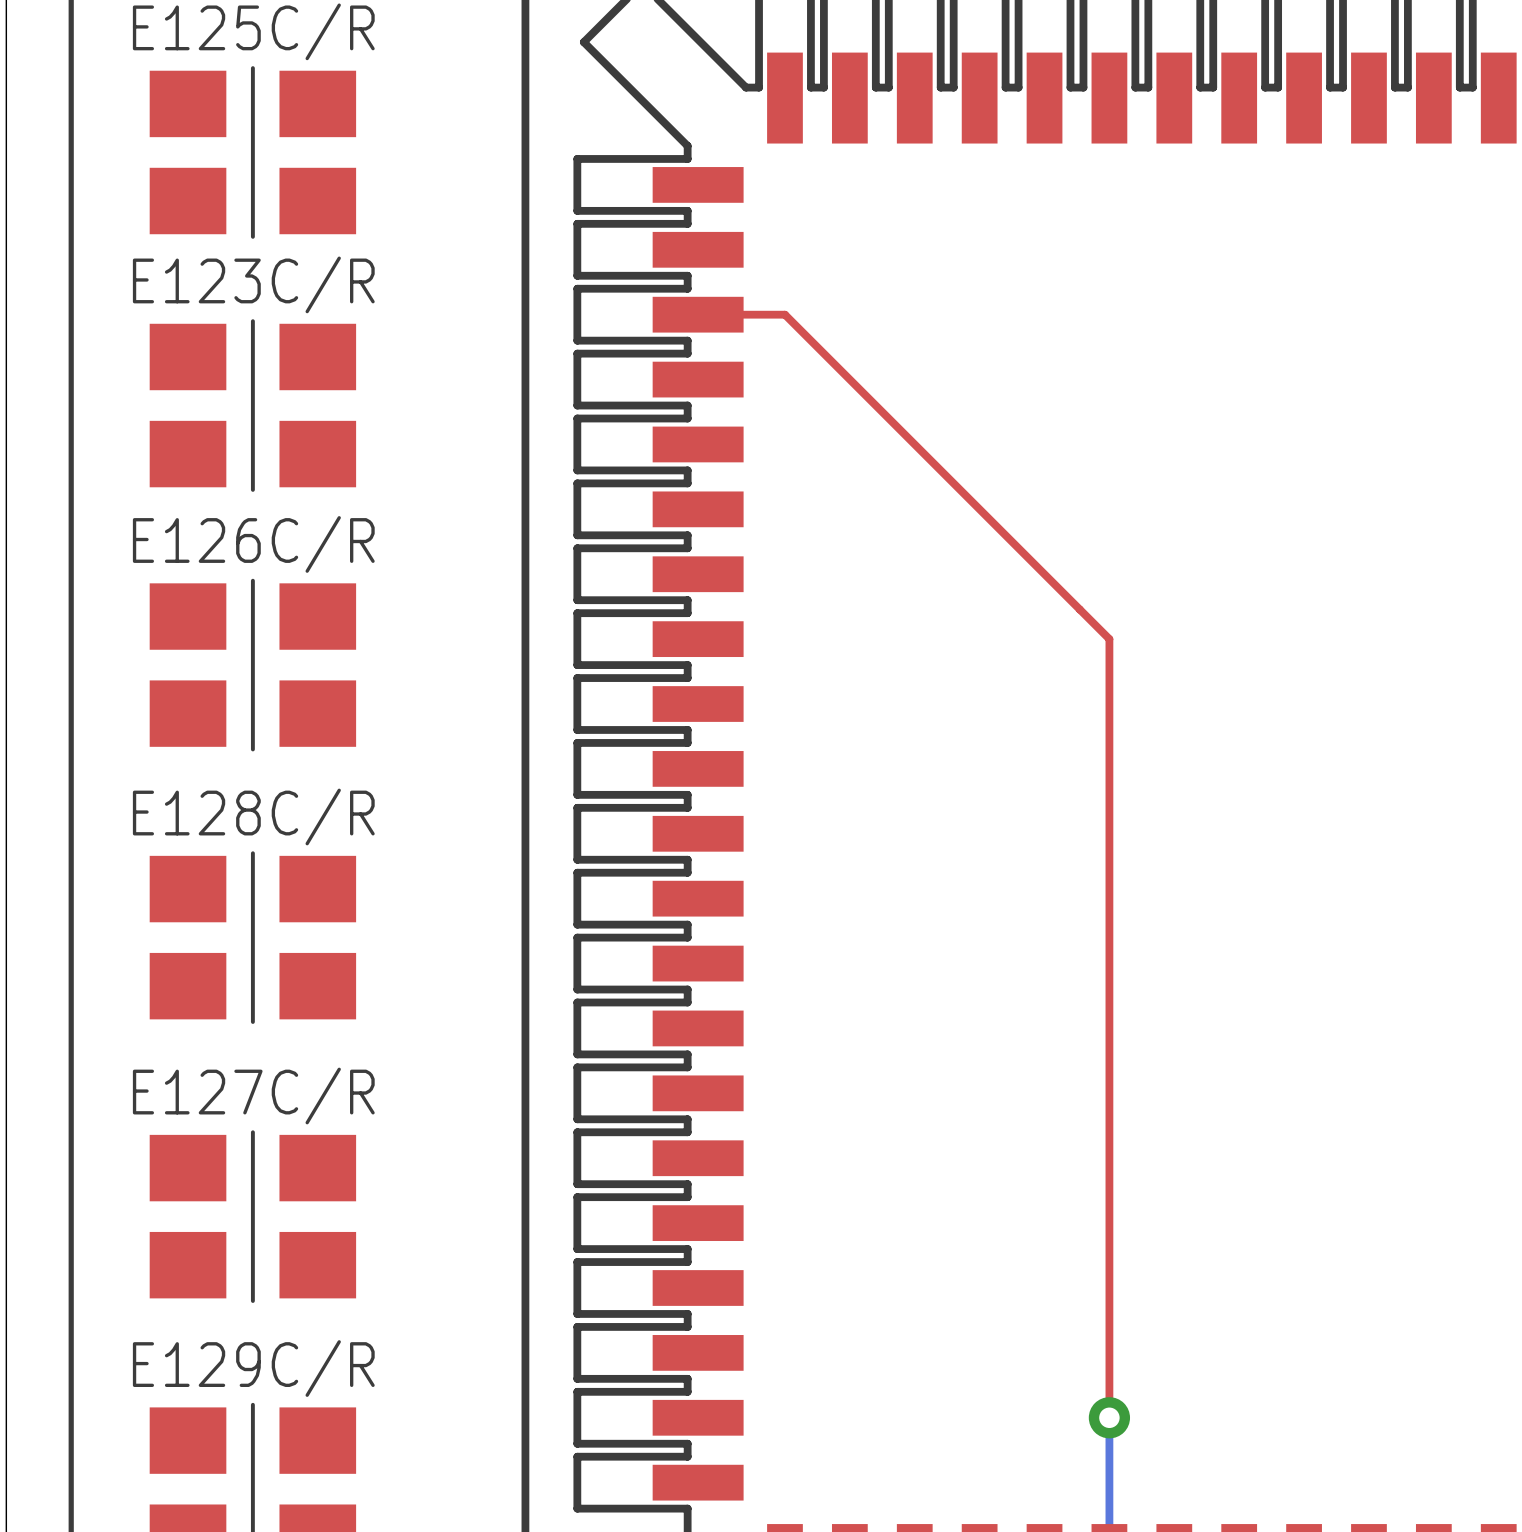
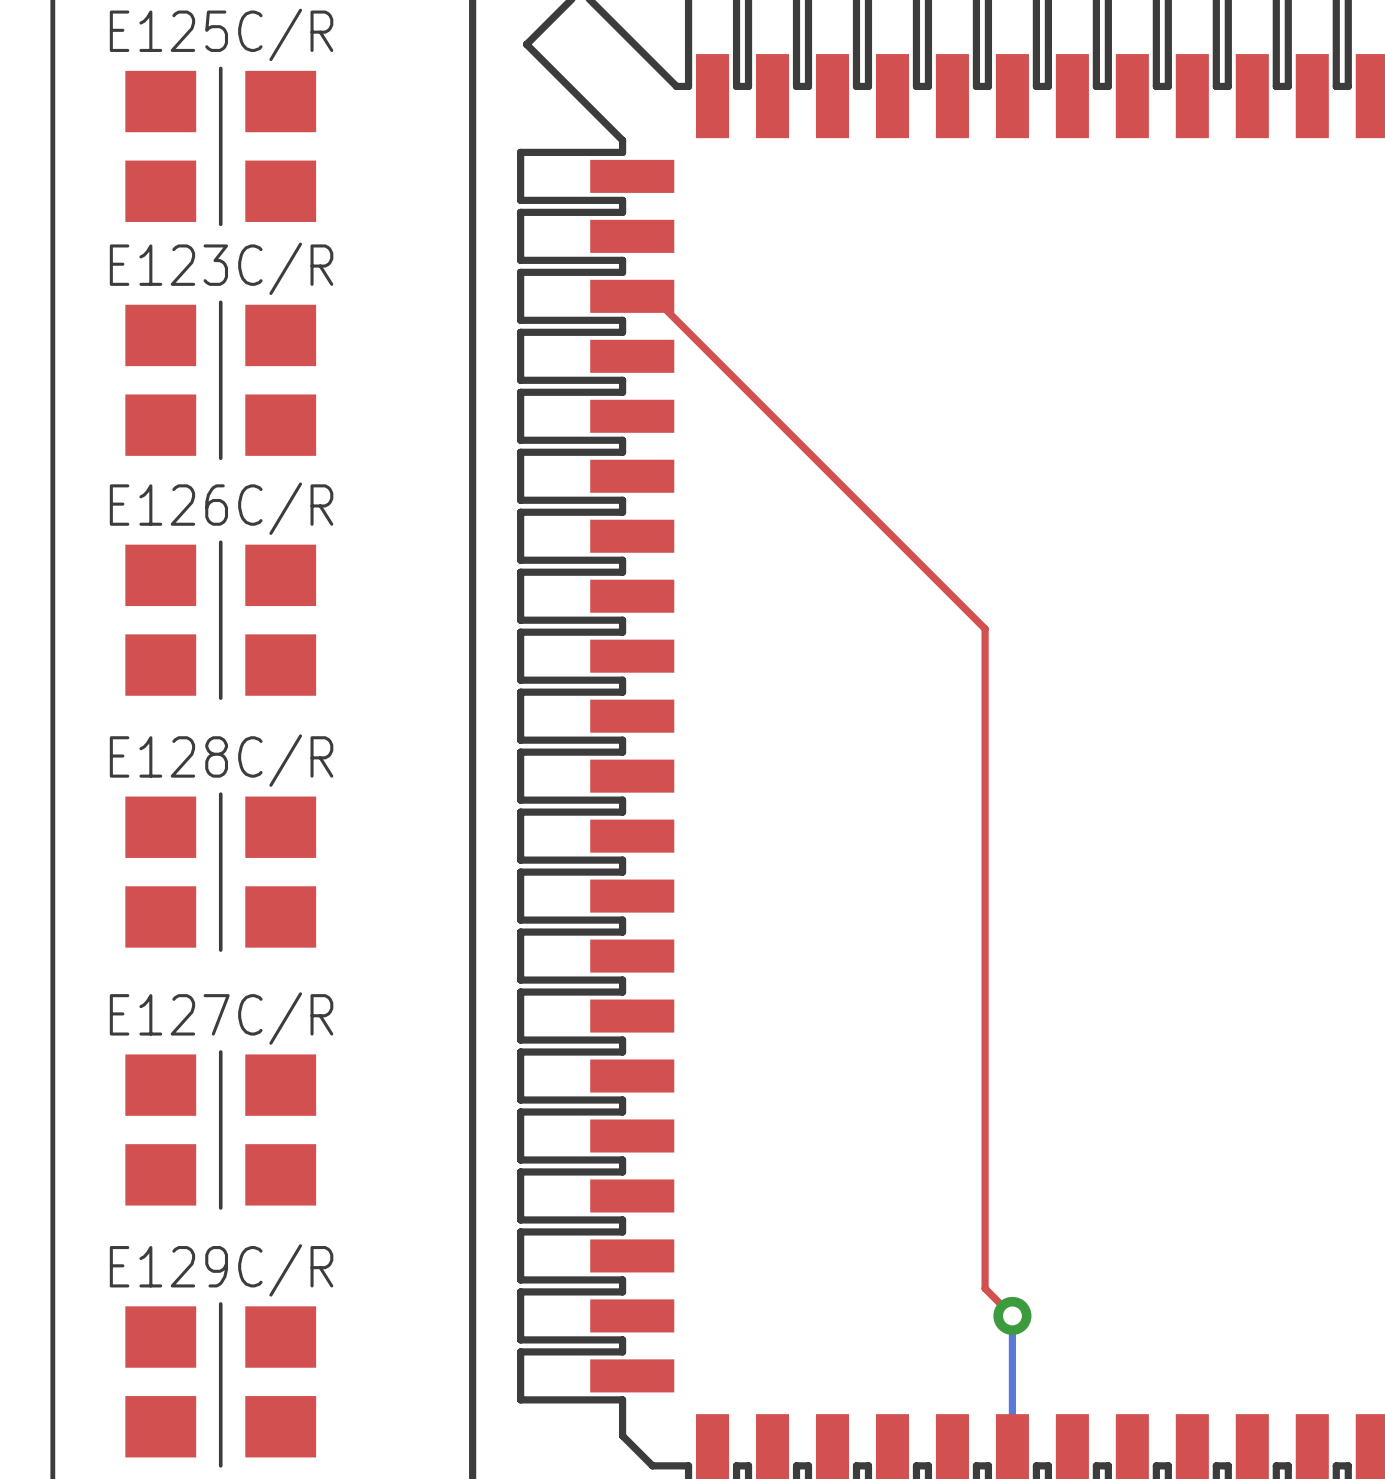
top track: (720, 314) (784, 314) (1109, 639) (1109, 1417) -> (652, 296) (985, 628) (985, 1288) (1012, 1315)

